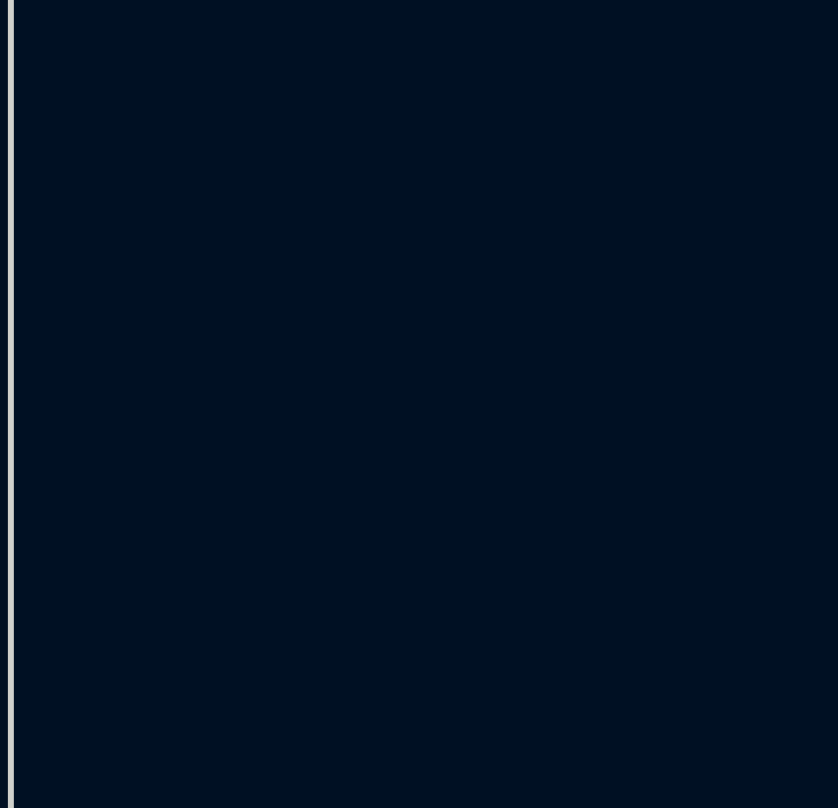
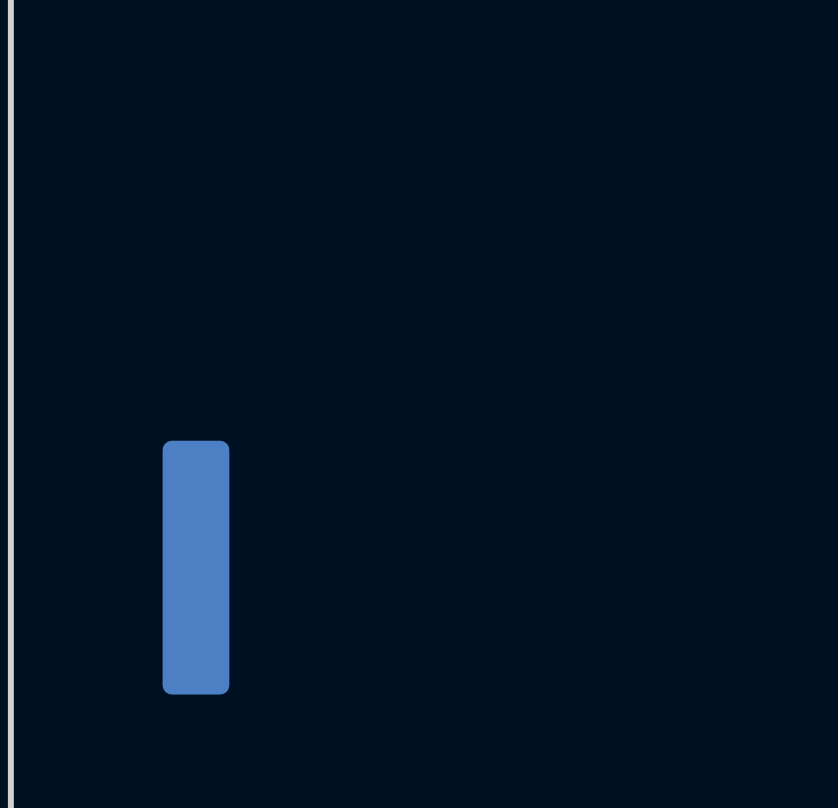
part: none -> (195, 567)

